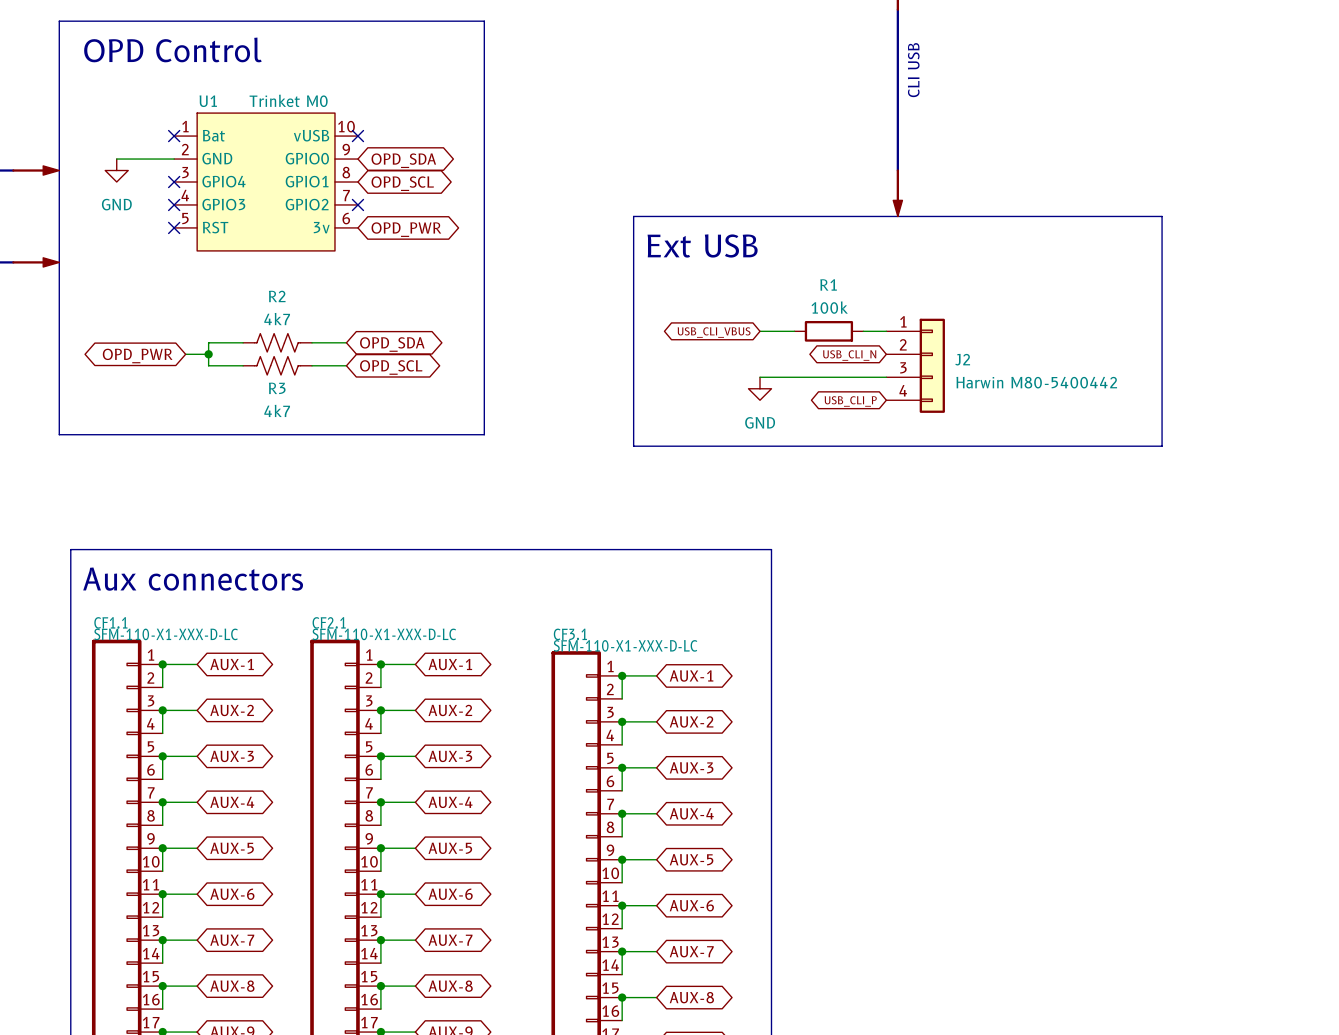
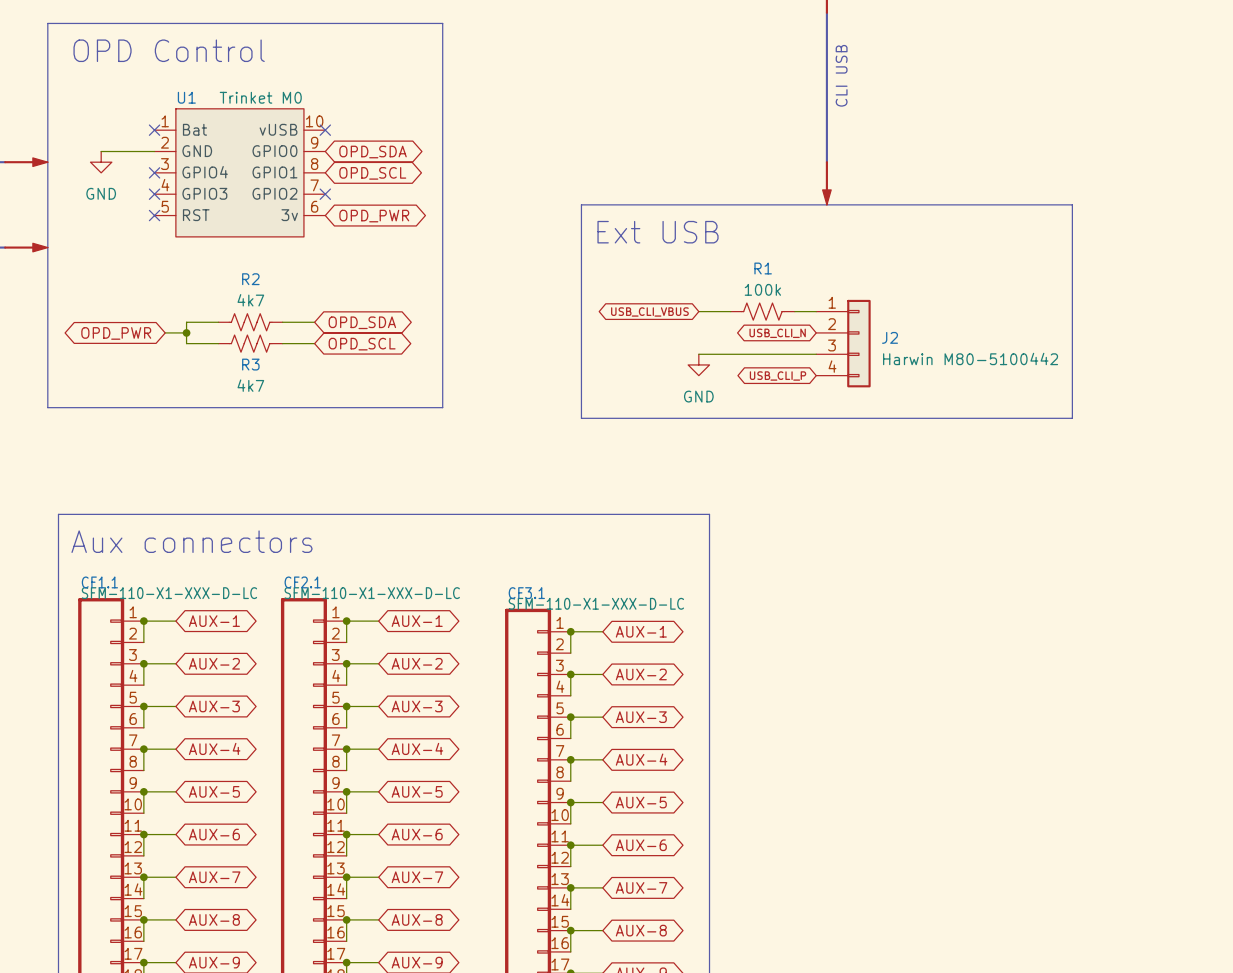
R1 symbol: [794, 320, 864, 342] -> [730, 303, 795, 321]
J2 value: Harwin M80-5400442 (1036, 382) -> Harwin M80-5100442 (970, 358)

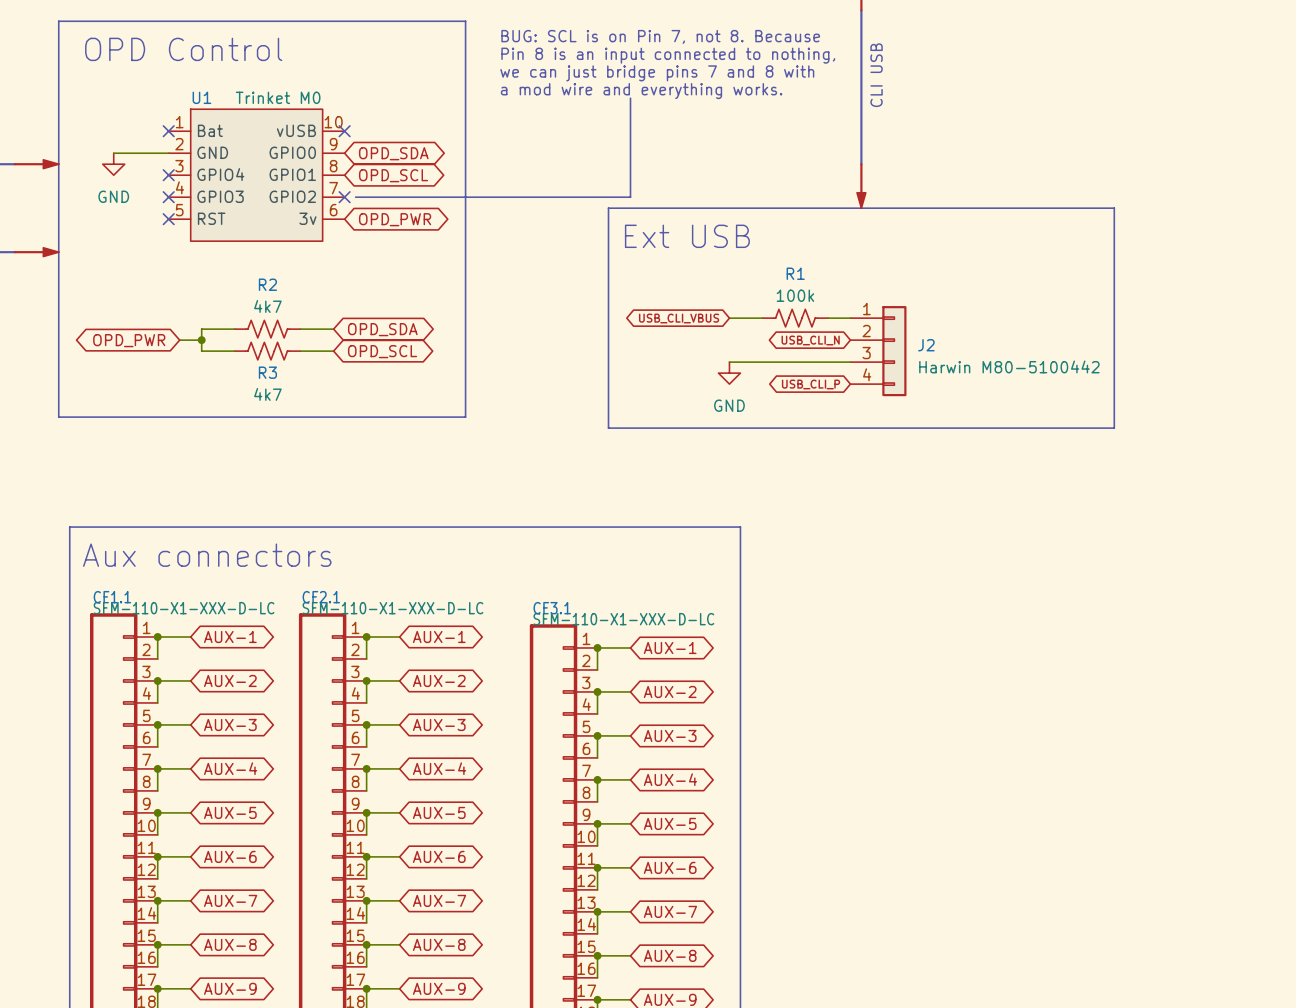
text: none -> BUG: SCL is on Pin 7, not 8. Because (660, 36)
text: none -> Pin 8 is an input connected to nothing, (668, 55)
text: none -> we can just bridge pins 7 and 8 with (657, 73)
text: none -> a mod wire and everything works. (641, 91)
line: none -> (630, 98) (630, 197) (355, 197)

